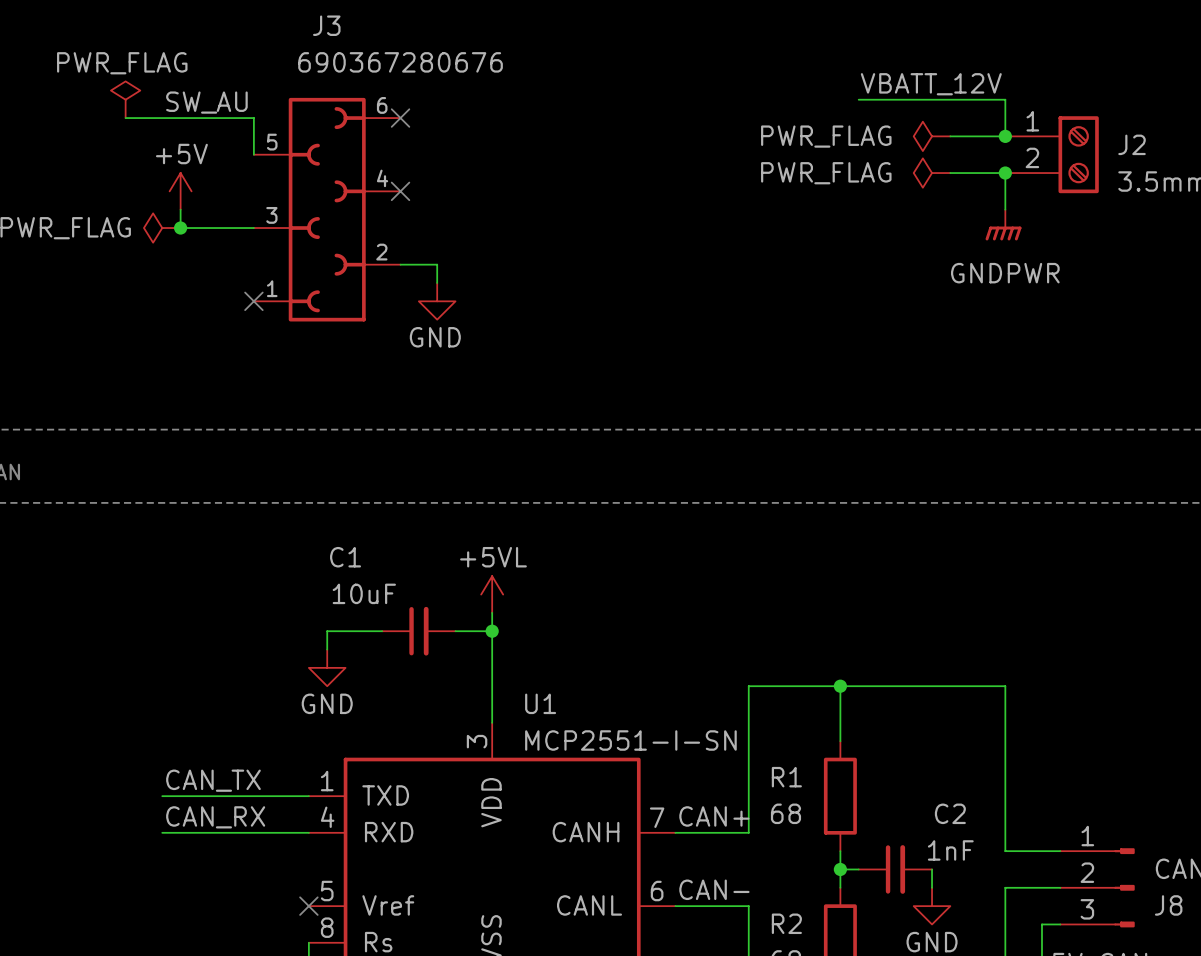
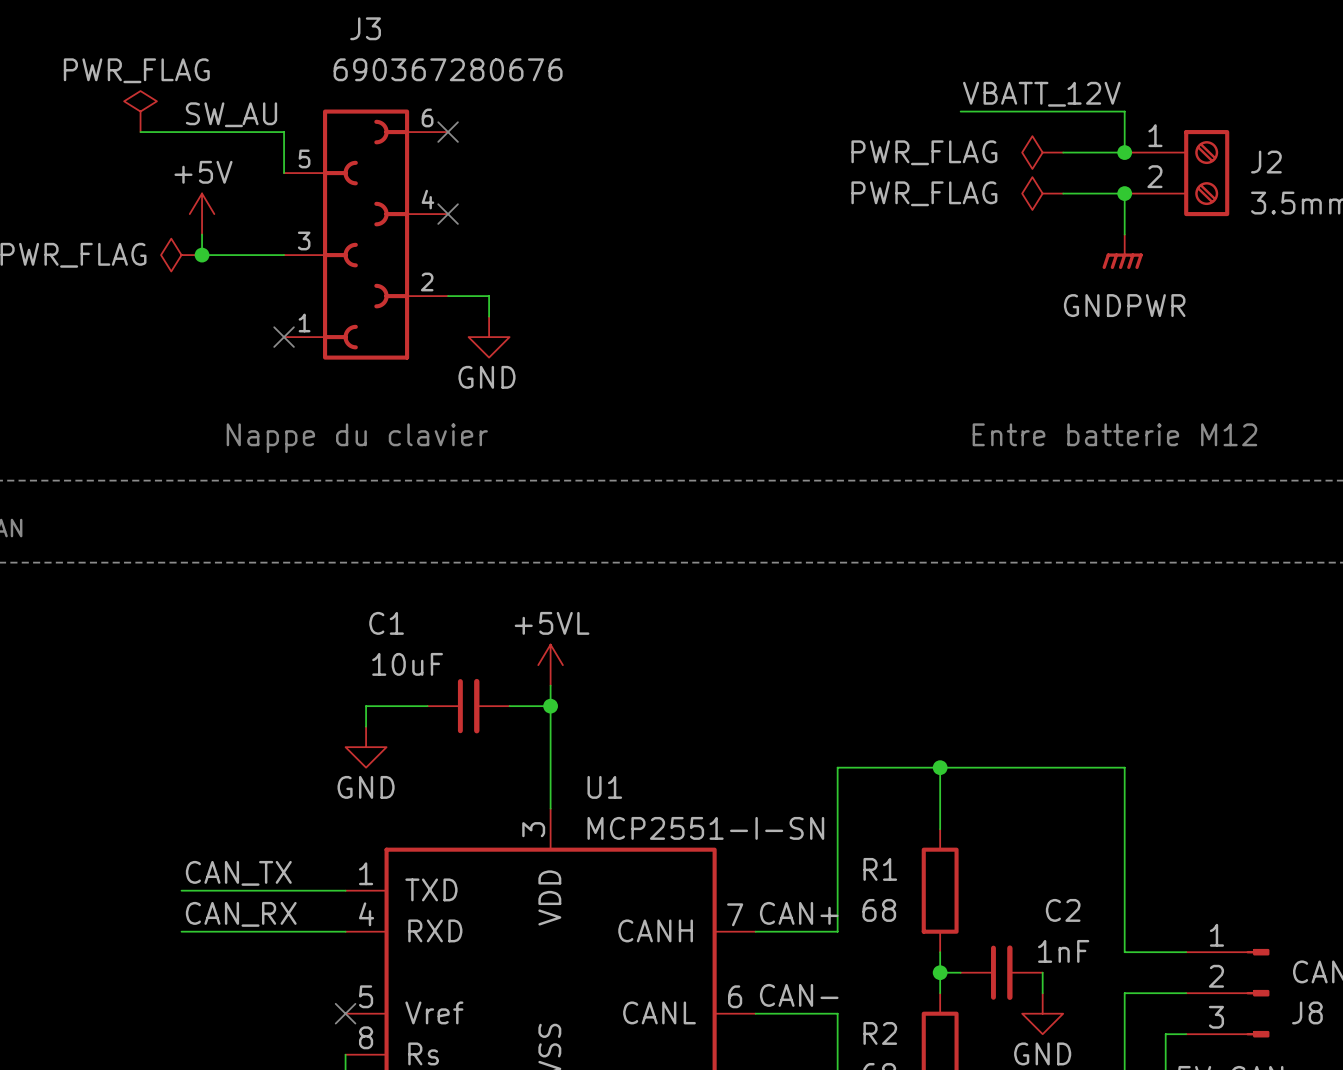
text: none -> Entre batterie M12 (1114, 434)
text: none -> Nappe du clavier (357, 438)

